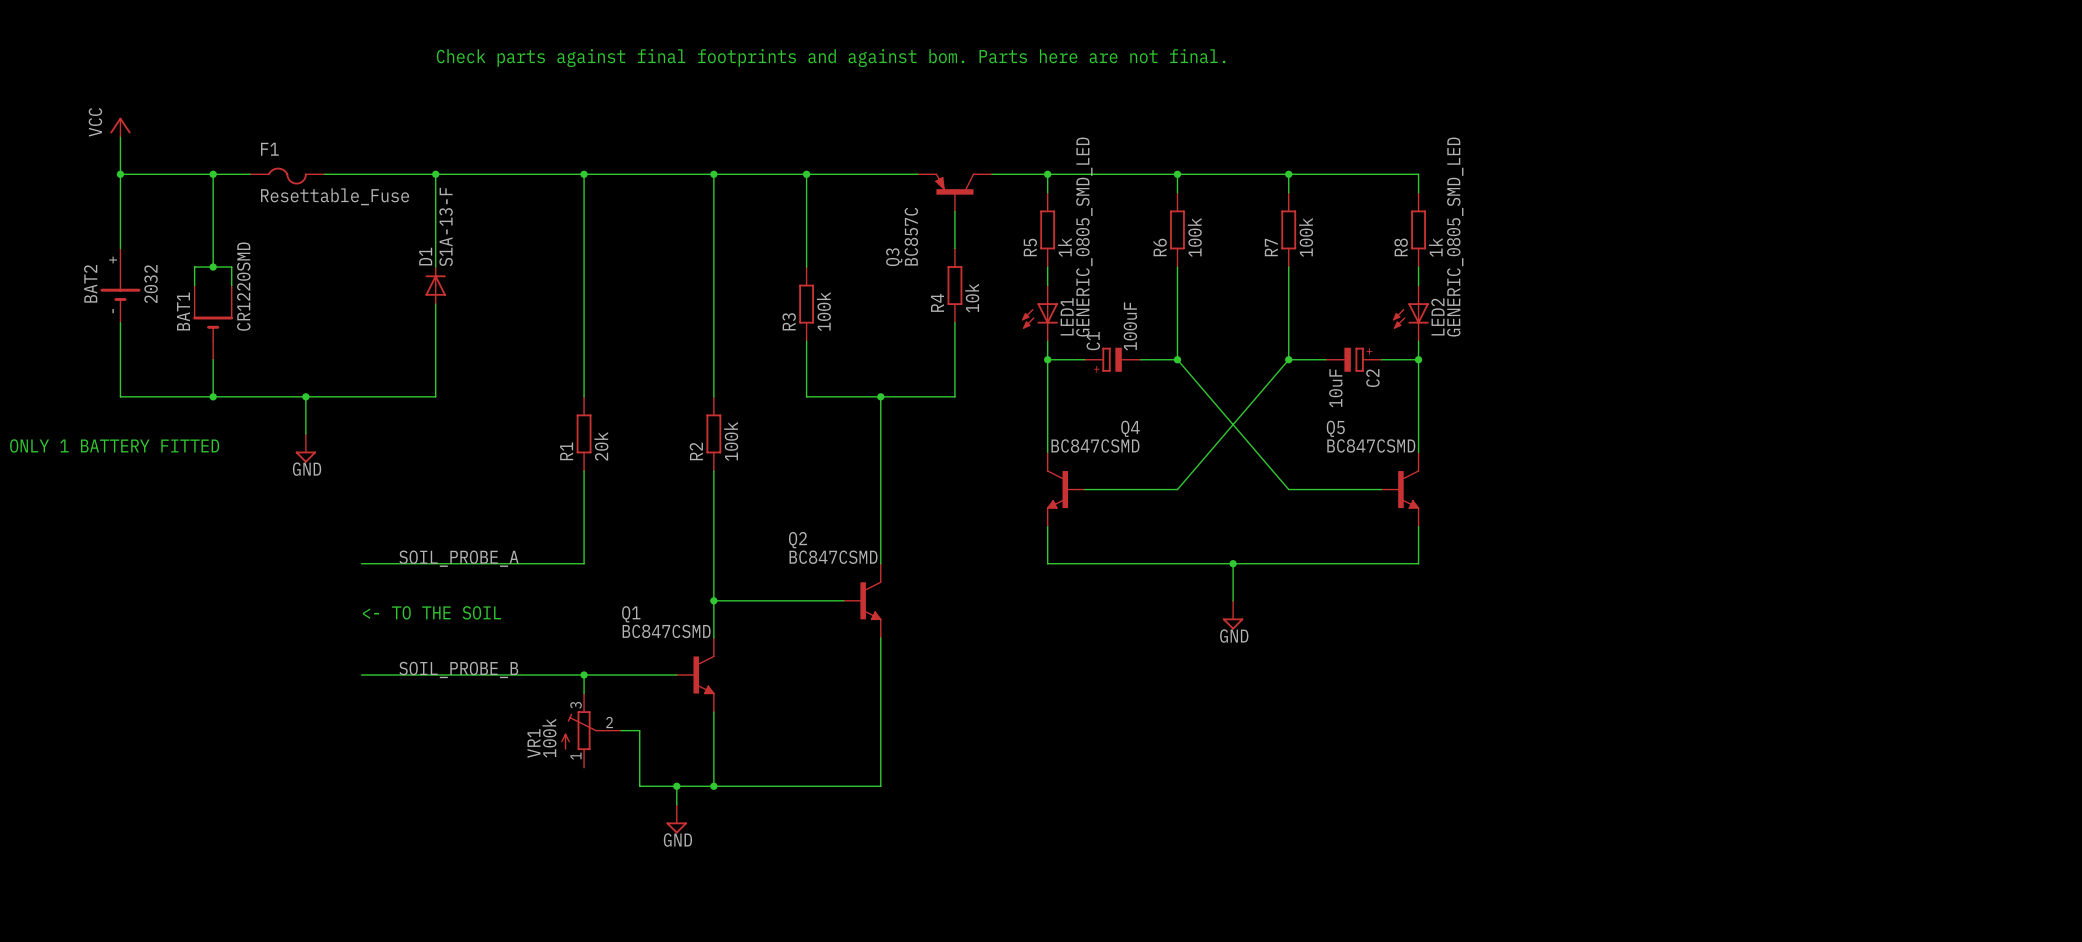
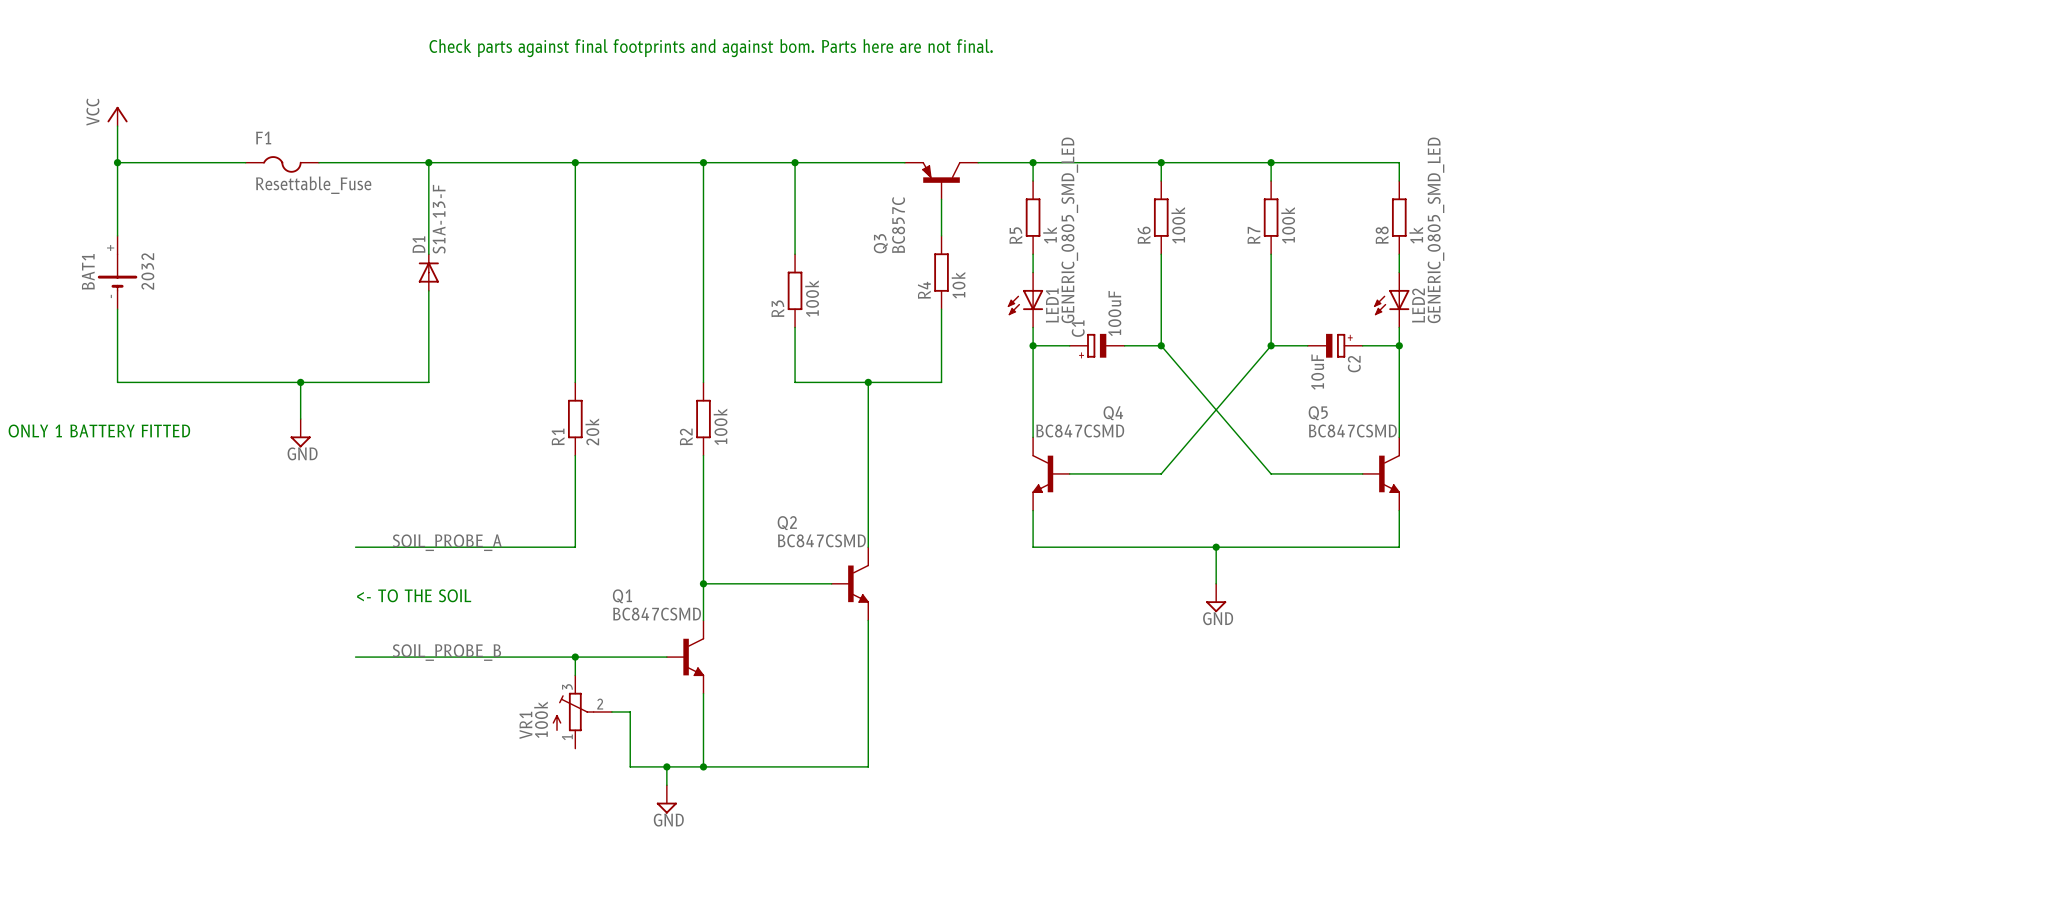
wire: (213, 174) (213, 267) -> none
junction: (213, 174) -> none
junction: (213, 267) -> none
BAT2 name: BAT2 (90, 283) -> BAT1 (88, 271)
wire: (194, 285) (194, 267) (231, 267) (231, 285) -> none
BAT1: CR1220SMD (213, 322) -> none
wire: (213, 359) (213, 396) -> none
junction: (213, 396) -> none

